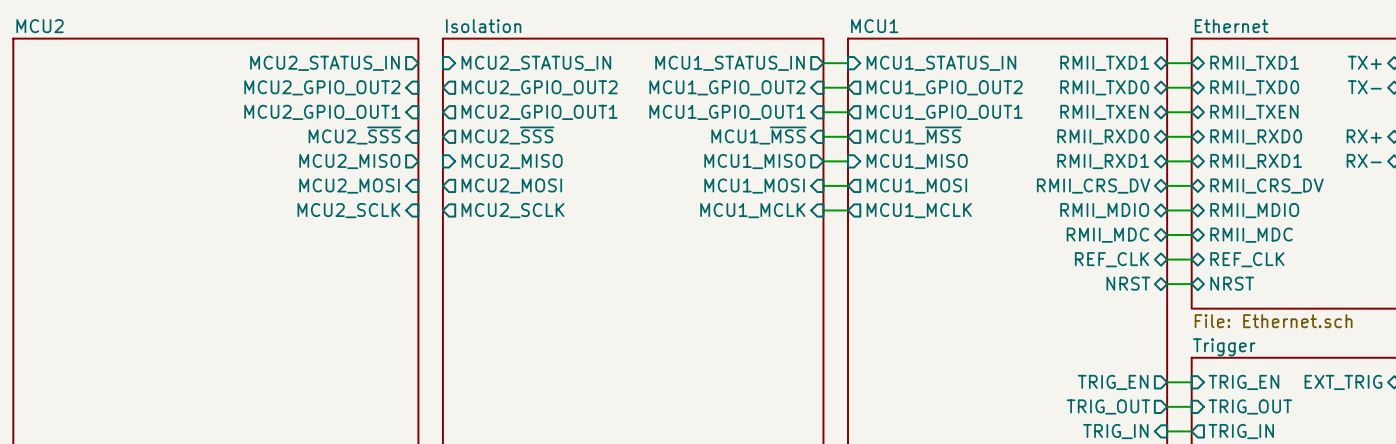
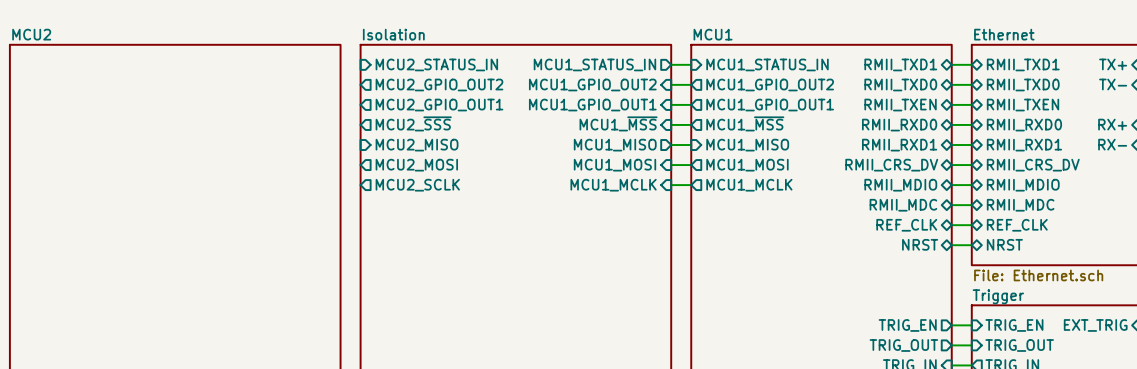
sheet pin: MCU2_STATUS_IN (324, 63) -> none
sheet pin: MCU2_GPIO_OUT2 (322, 87) -> none
sheet pin: MCU2_GPIO_OUT1 (322, 112) -> none
sheet pin: MCU2_~{SSS} (355, 135) -> none
sheet pin: MCU2_MISO (349, 161) -> none
sheet pin: MCU2_MOSI (349, 186) -> none
sheet pin: MCU2_SCLK (348, 210) -> none

